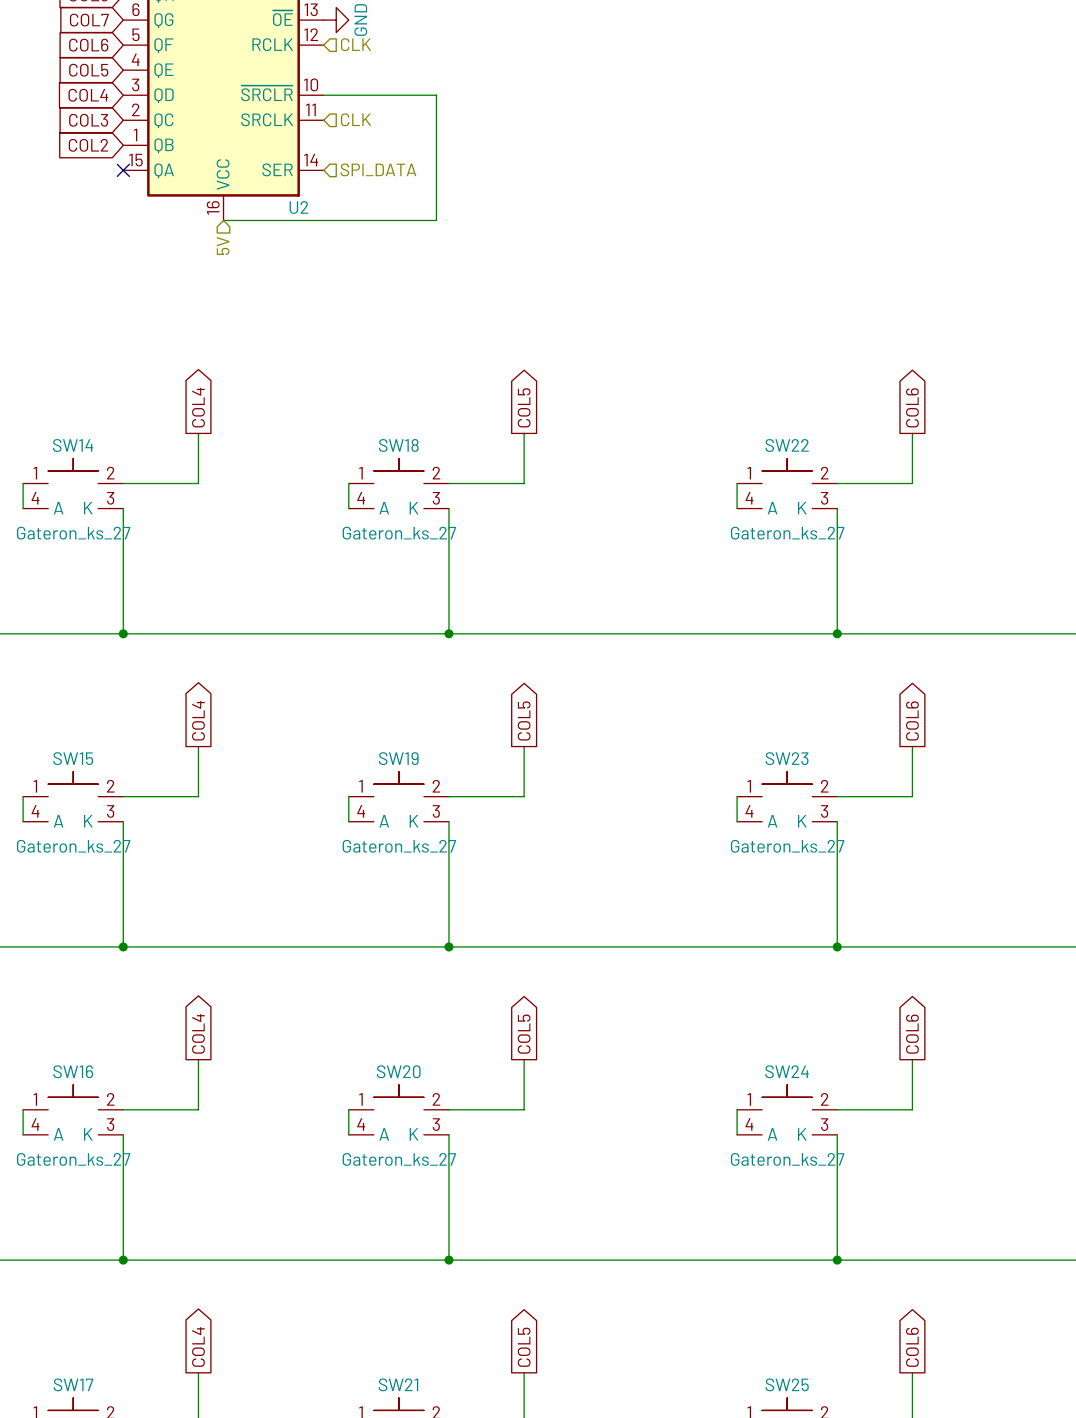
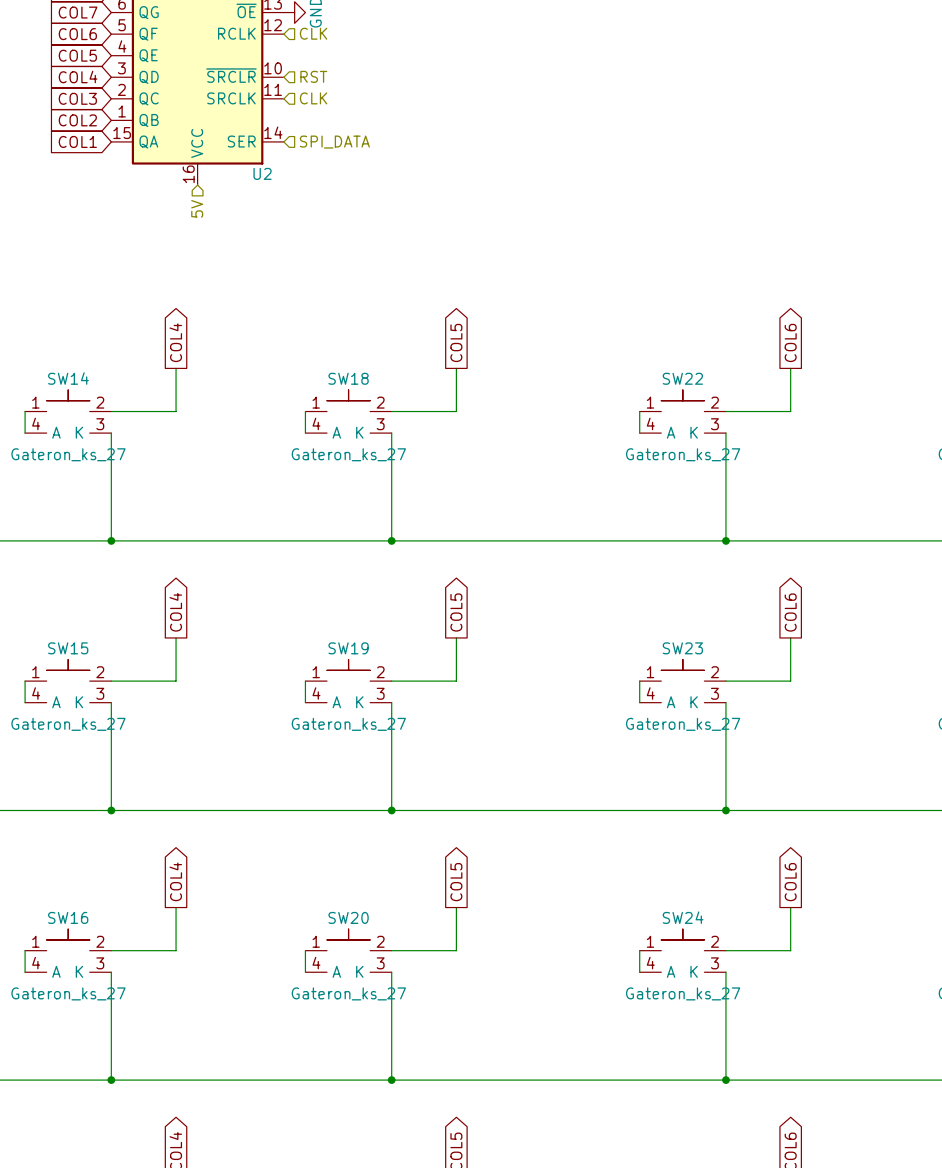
hierarchical label: none -> RST (313, 76)
wire: (323, 95) (436, 95) (436, 220) (223, 220) -> none
global label: none -> COL1 (77, 141)
no-connect mark: (123, 170) -> none

